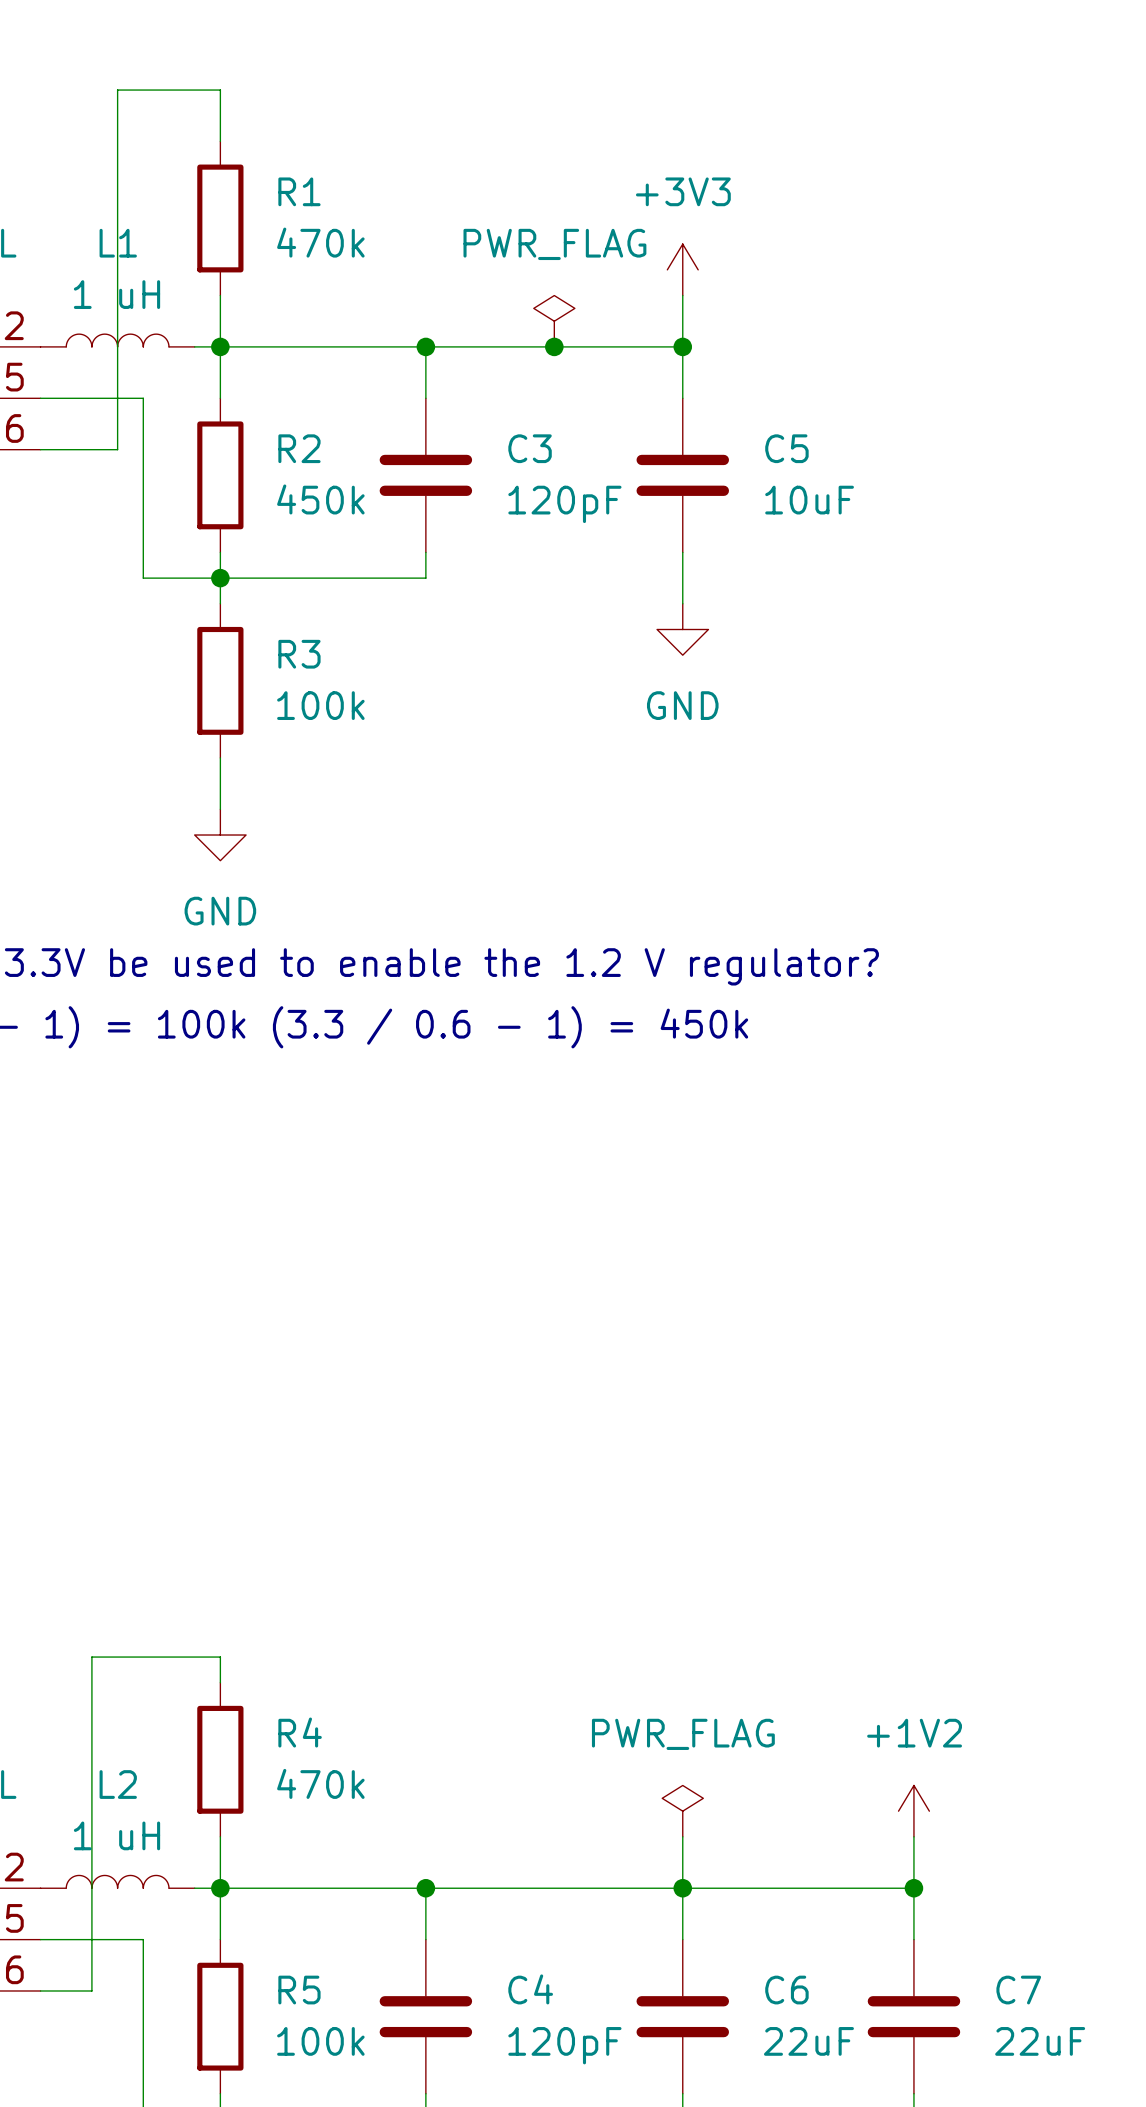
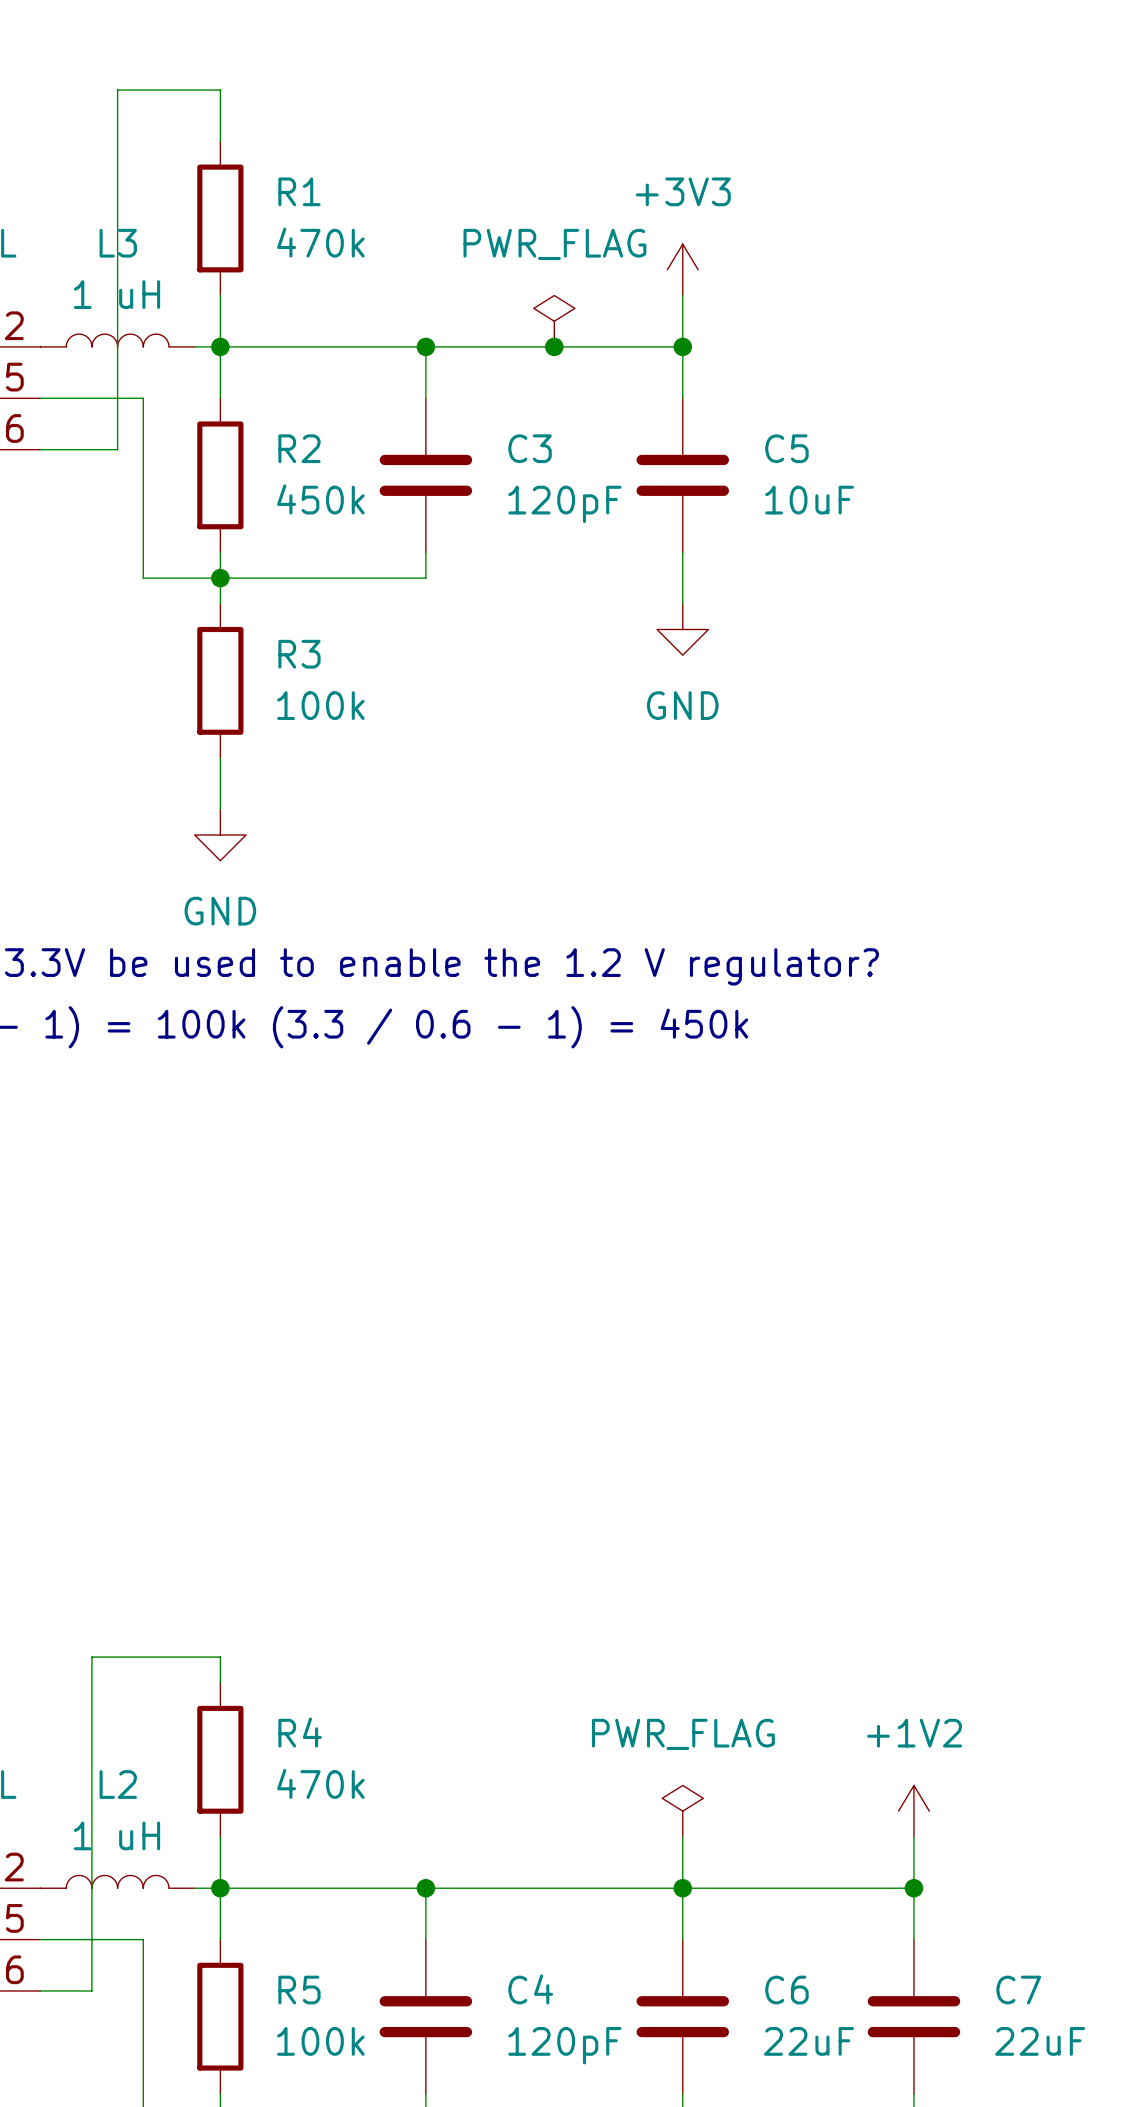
L1 name: L1 (118, 243) -> L3 (118, 243)

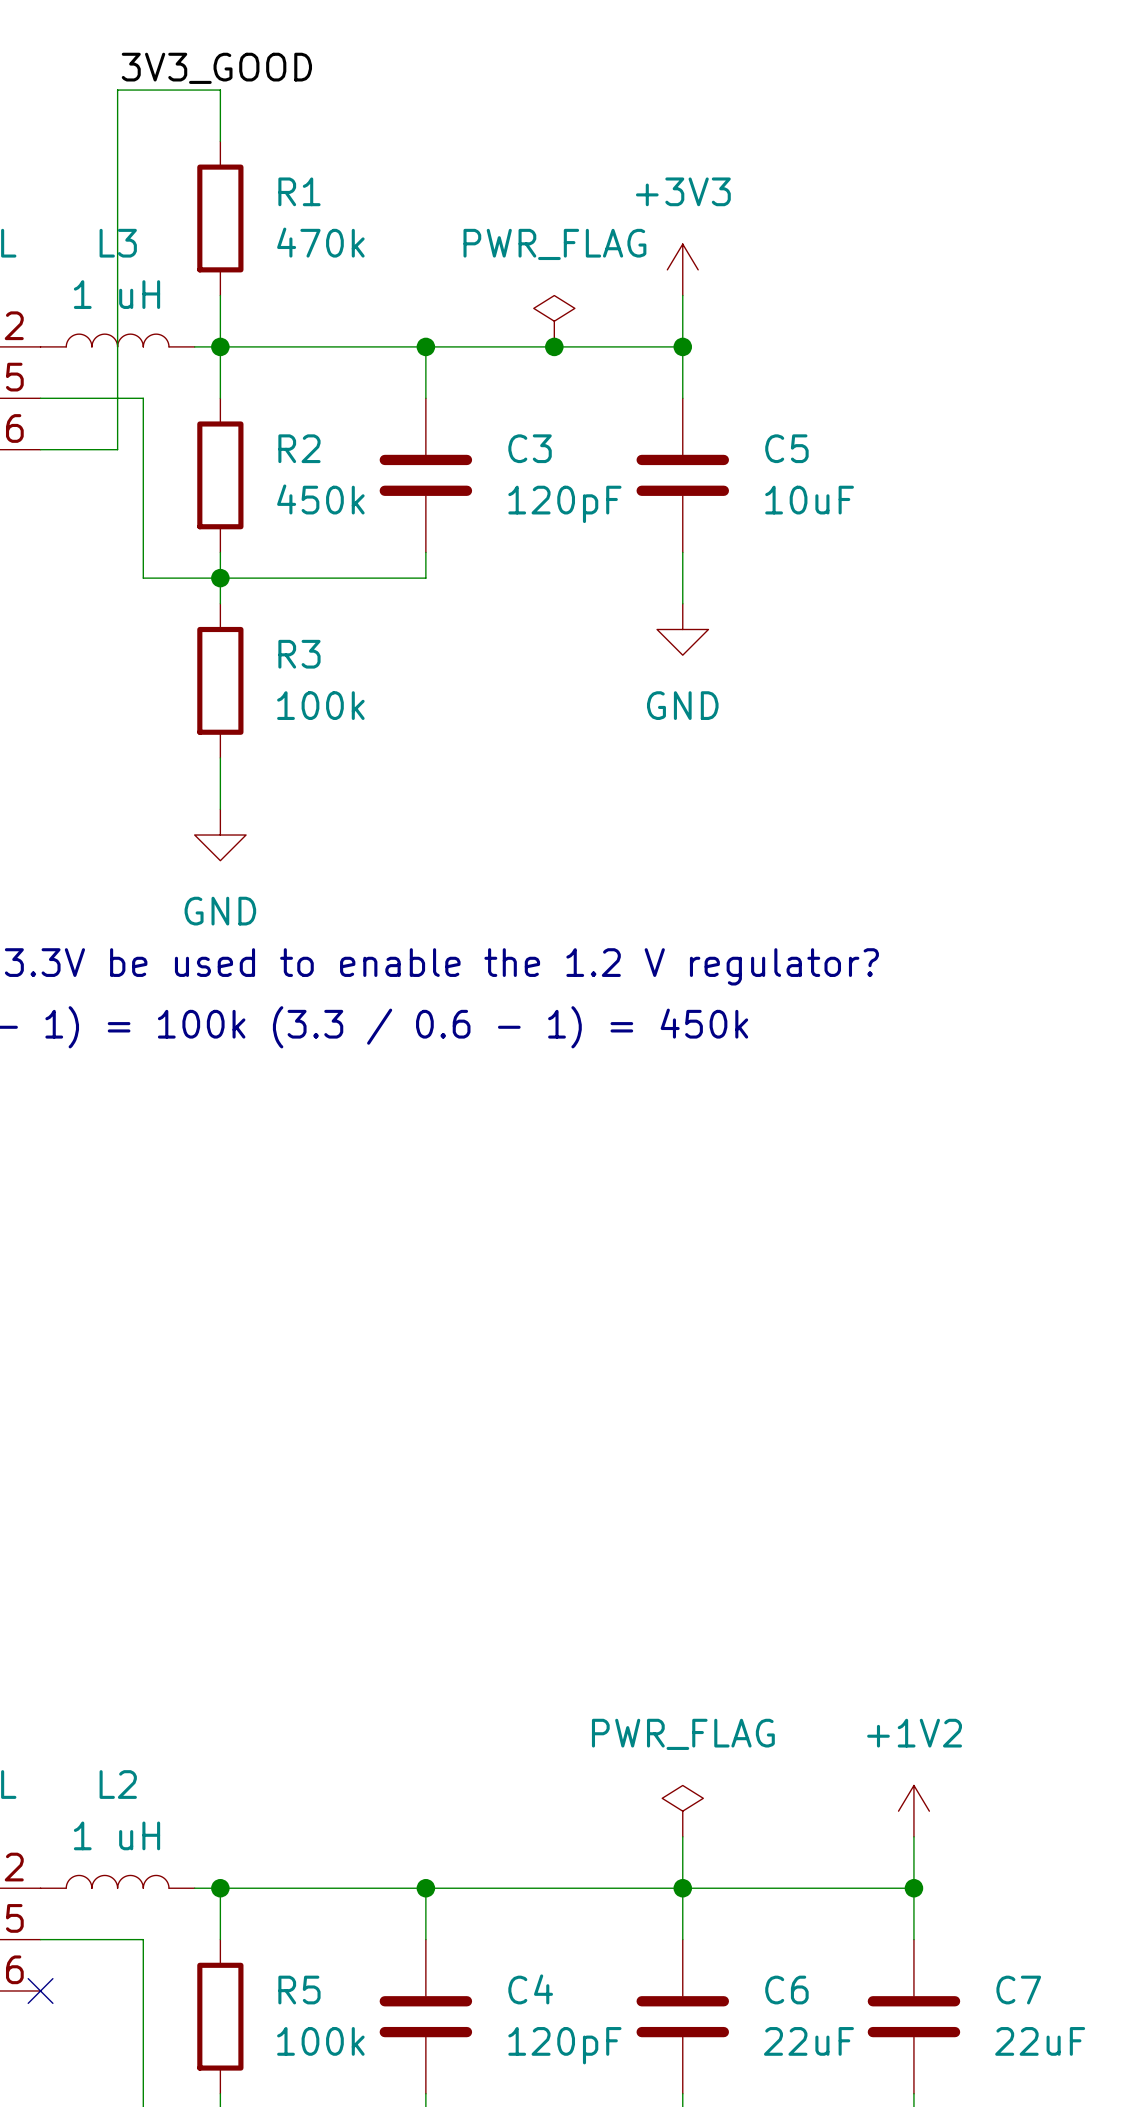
label: none -> 3V3_GOOD (216, 68)
wire: (220, 1682) (220, 1657) (91, 1657) (91, 1990) (40, 1990) -> none
R4: 470k (220, 1759) -> none
wire: (220, 1836) (220, 1888) -> none
no-connect mark: none -> (40, 1990)

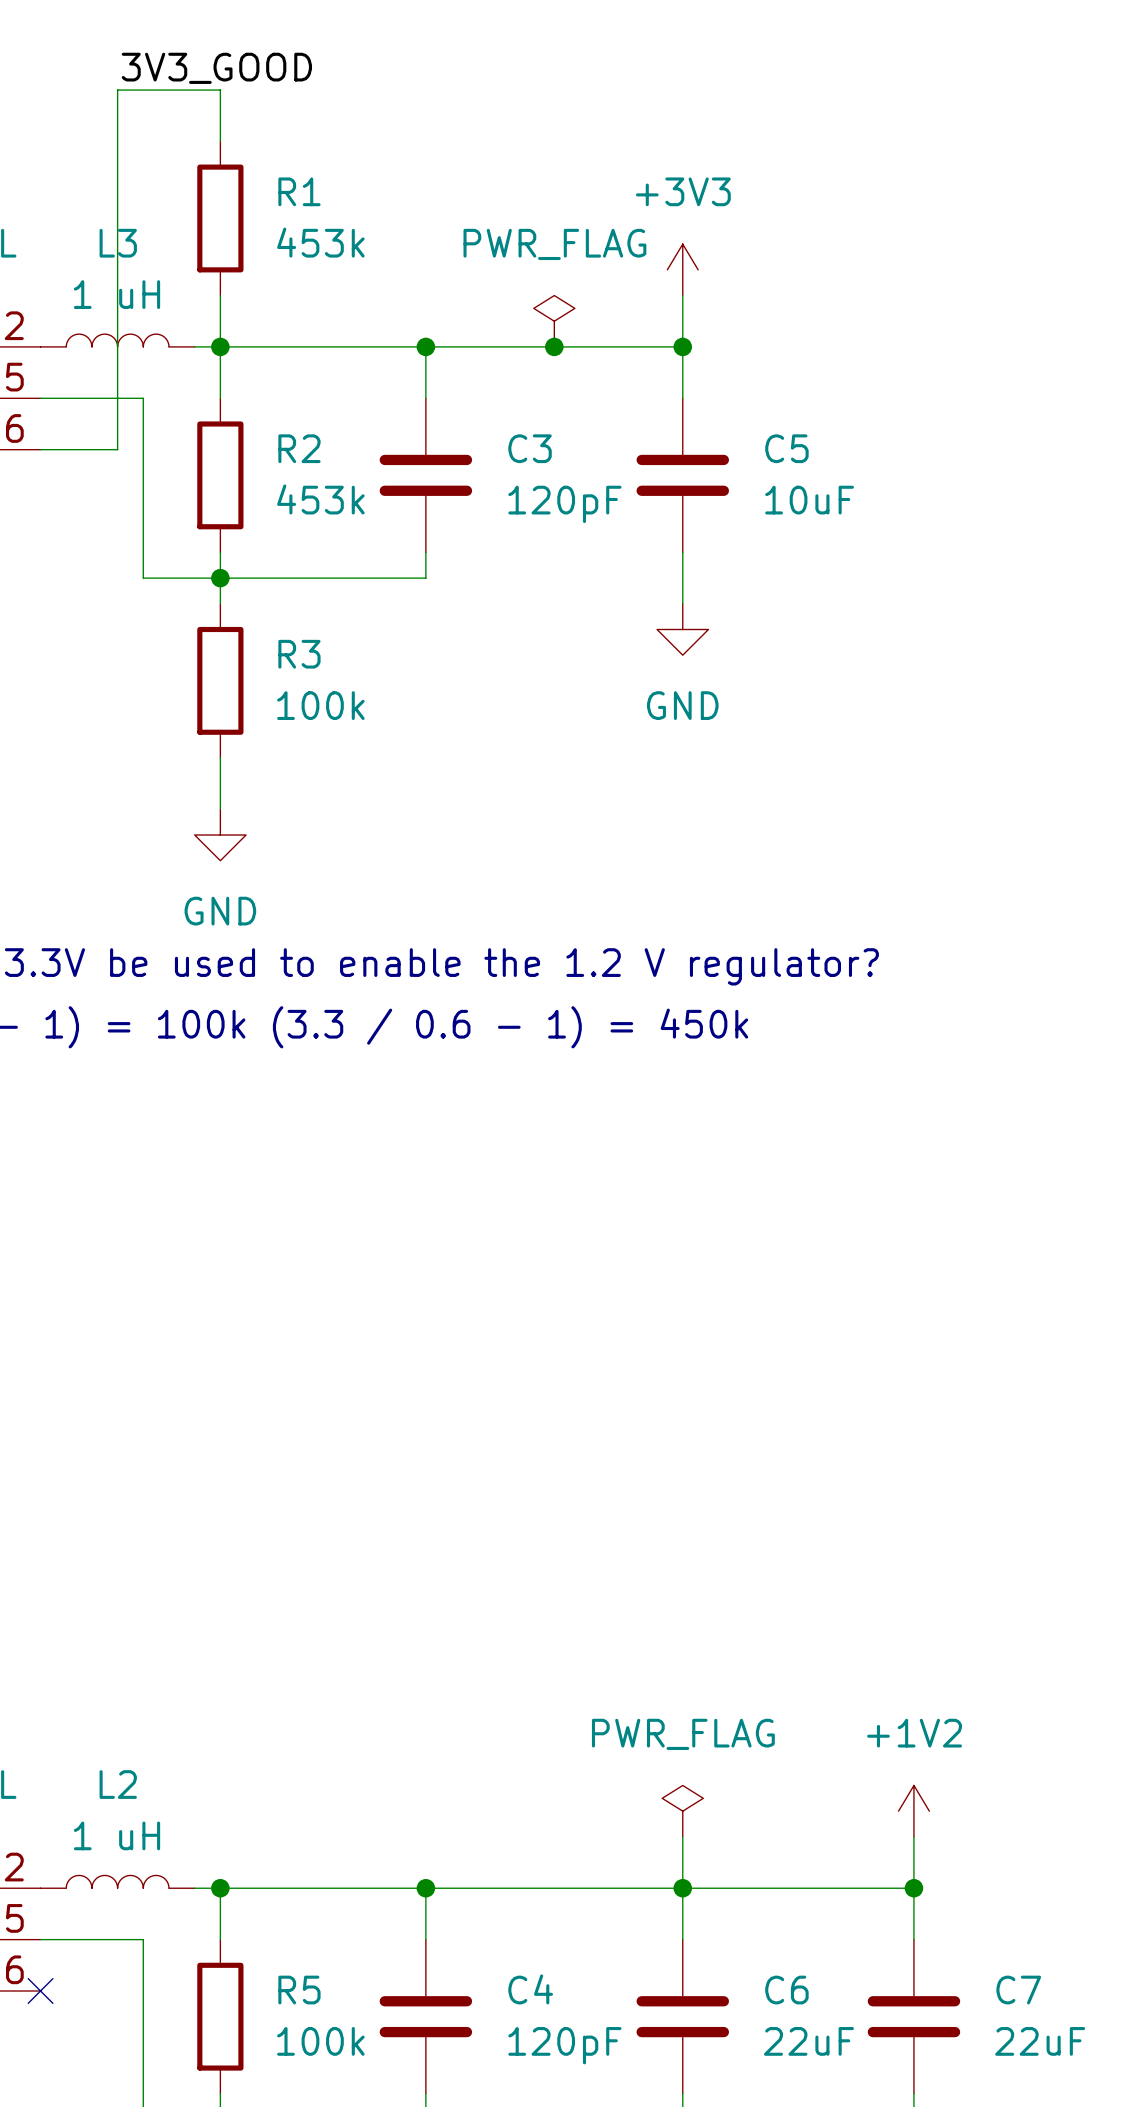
R1 value: 470k (320, 242) -> 453k (320, 242)
R2 value: 450k (320, 499) -> 453k (320, 499)

